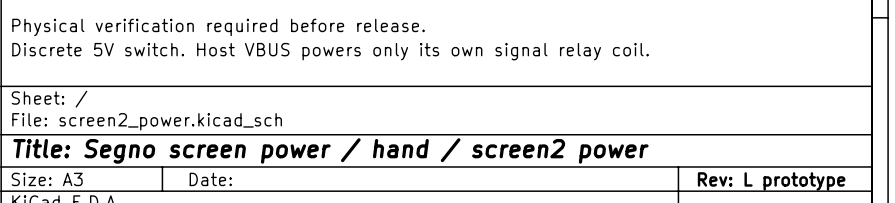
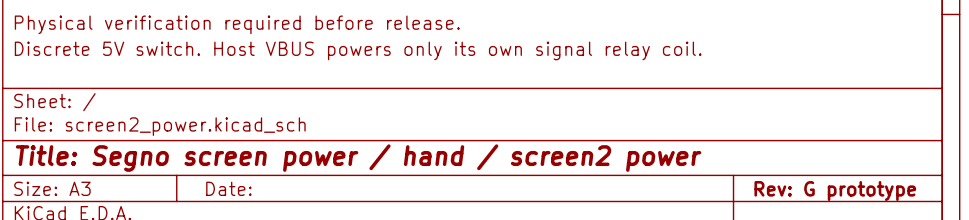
title block: Rev: L prototype (771, 181) -> Rev: G prototype (835, 191)

